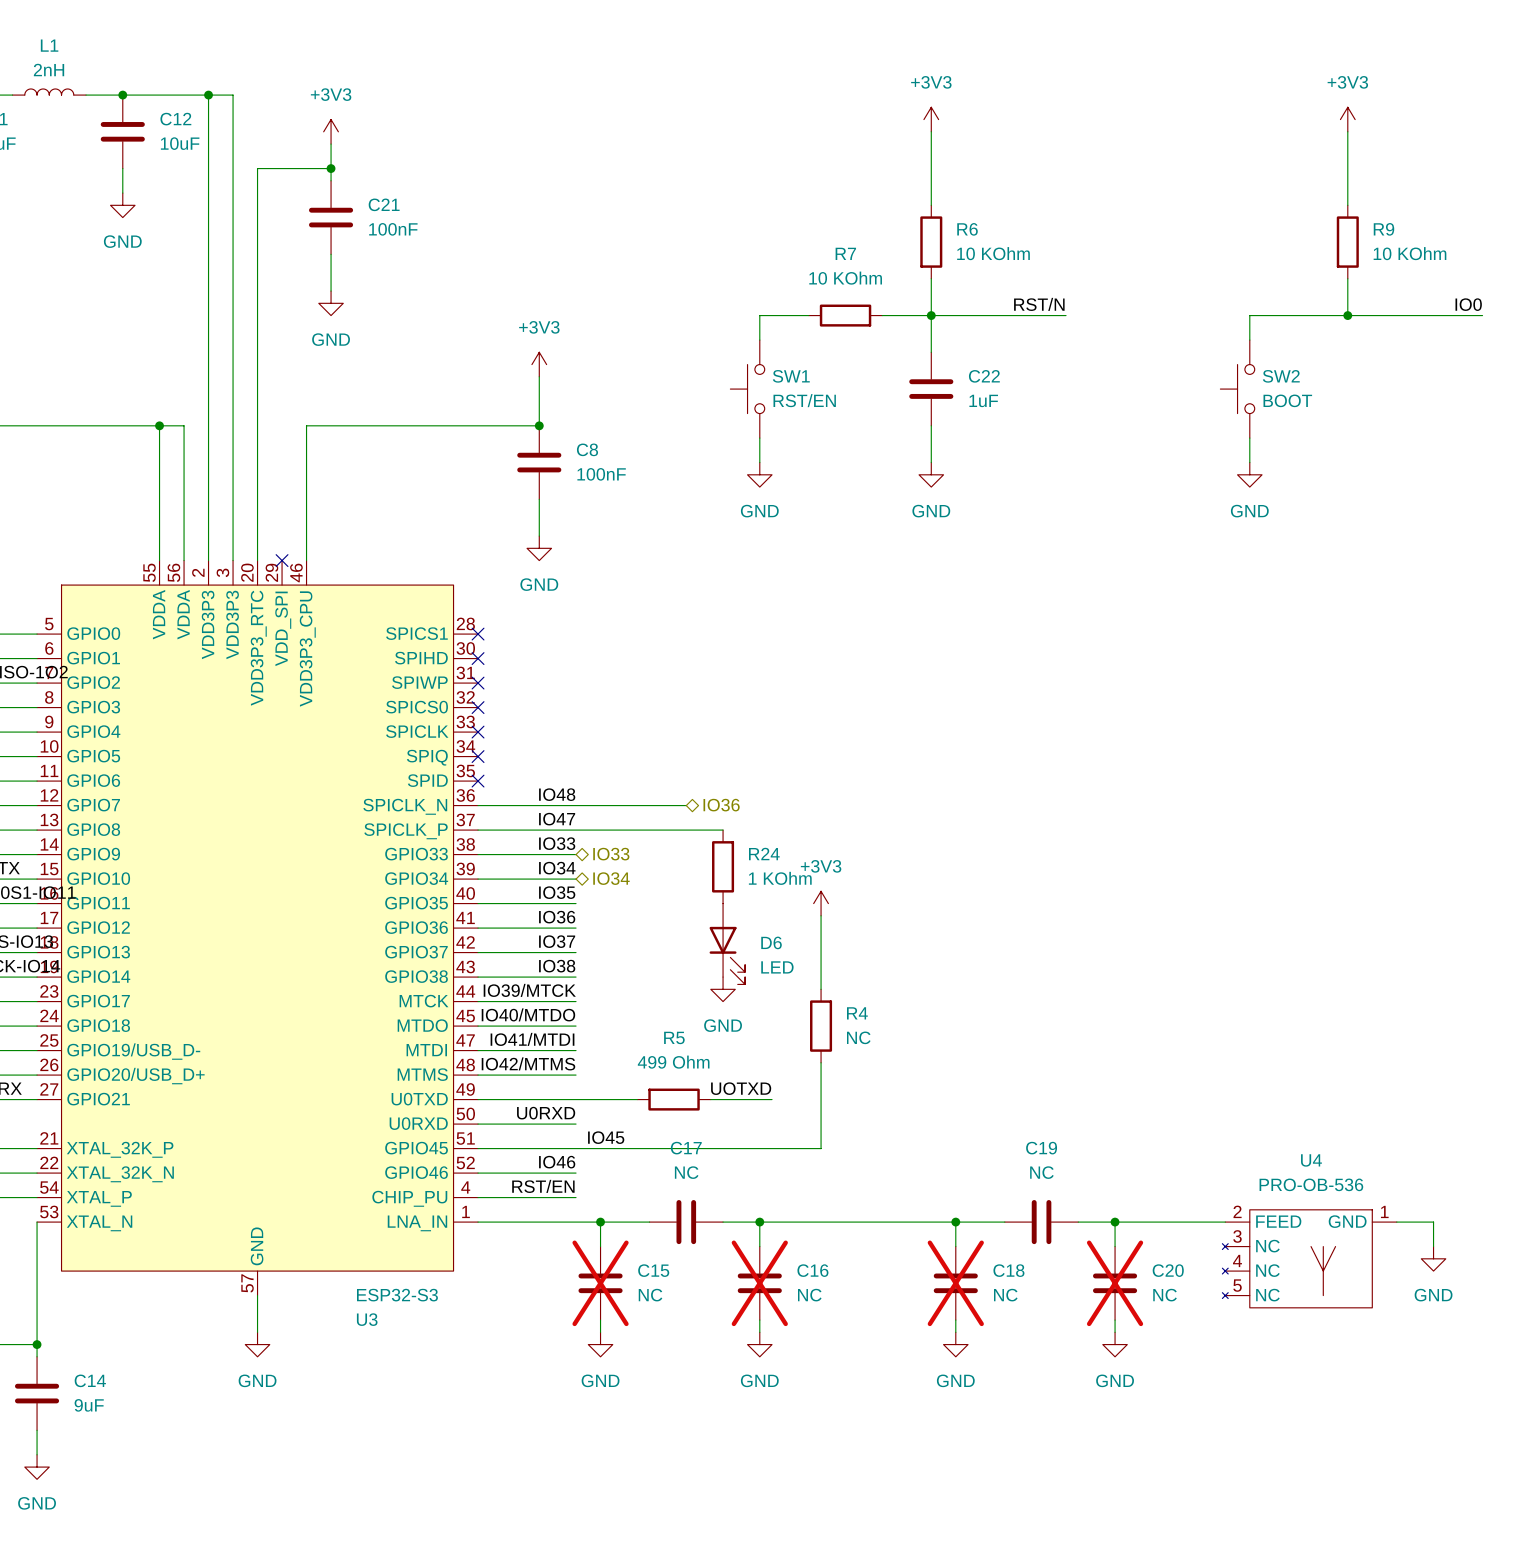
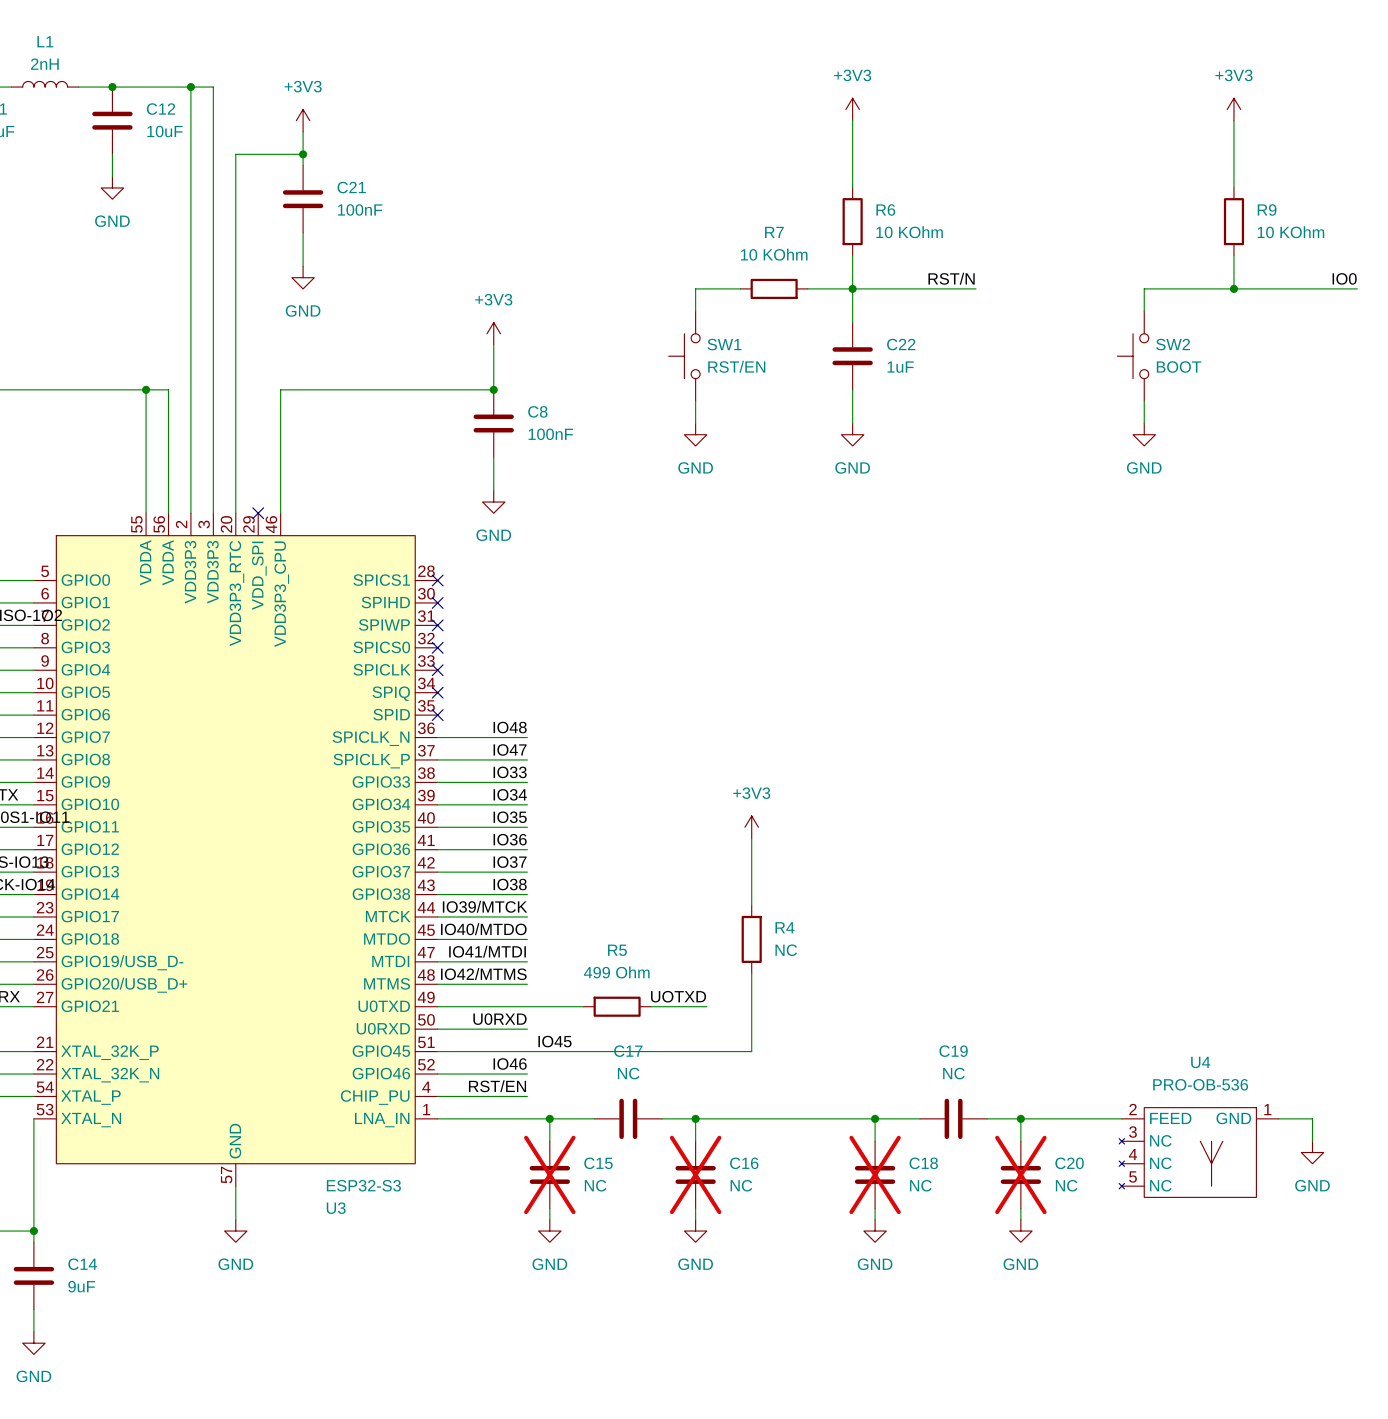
wire: (576, 805) (686, 805) -> none
hierarchical label: IO36 (721, 805) -> none
wire: (576, 830) (723, 830) -> none
hierarchical label: IO33 (611, 854) -> none
R24: 1 KOhm (723, 866) -> none
hierarchical label: IO34 (611, 878) -> none
D6: LED (727, 944) -> none
power symbol: GND (723, 989) -> none

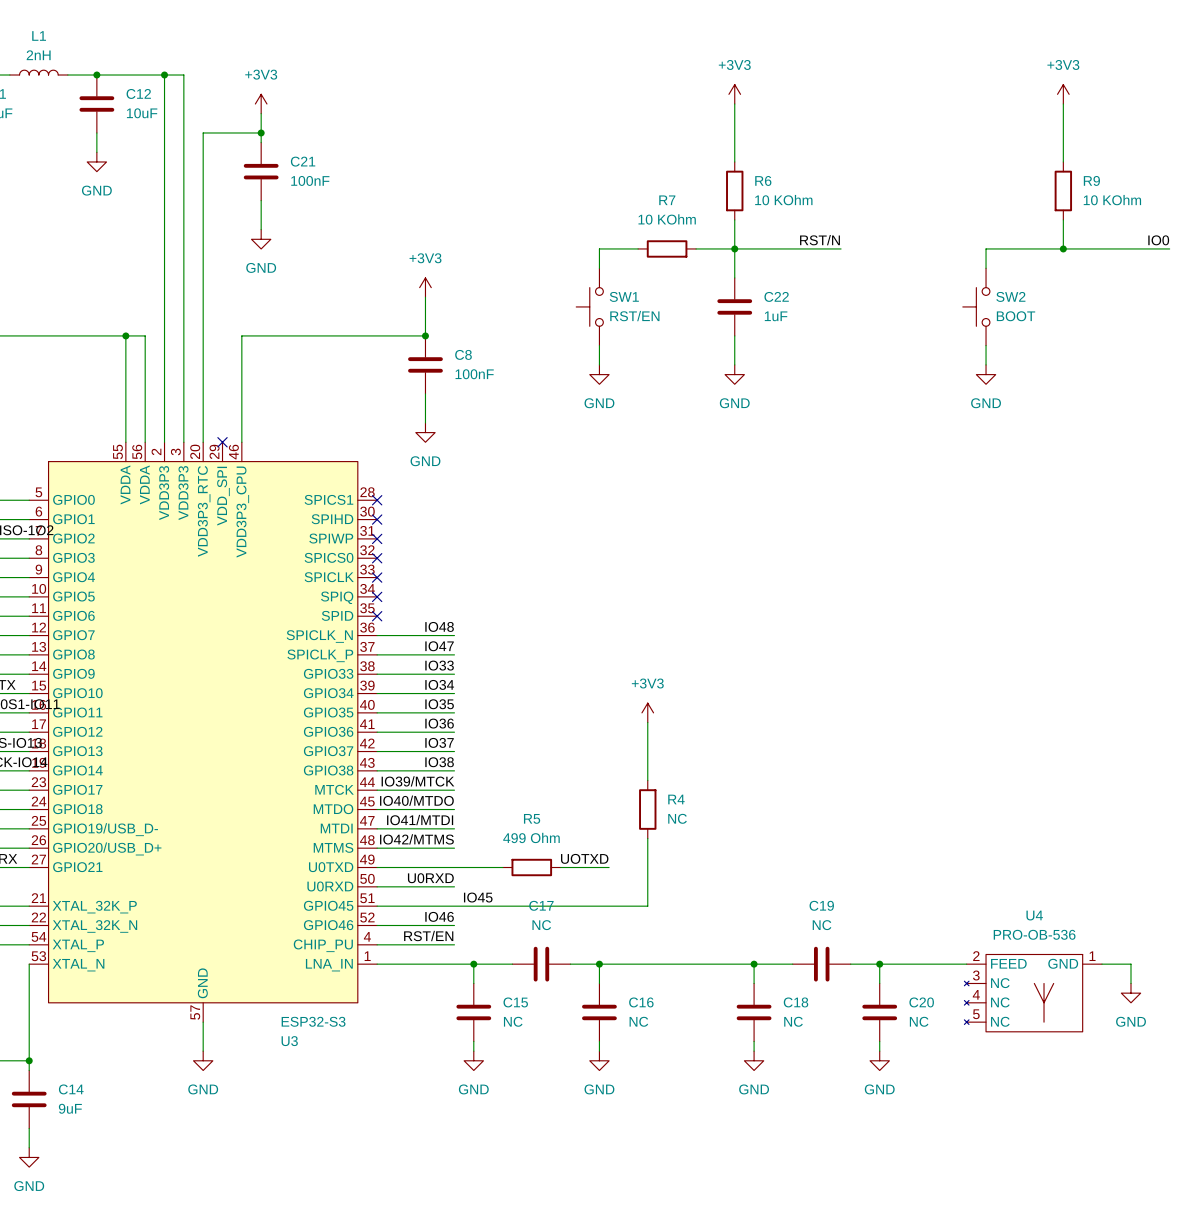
C15 do-not-place cross: (549, 1174) -> none
C16 do-not-place cross: (695, 1174) -> none
C18 do-not-place cross: (875, 1174) -> none
C20 do-not-place cross: (1020, 1174) -> none

